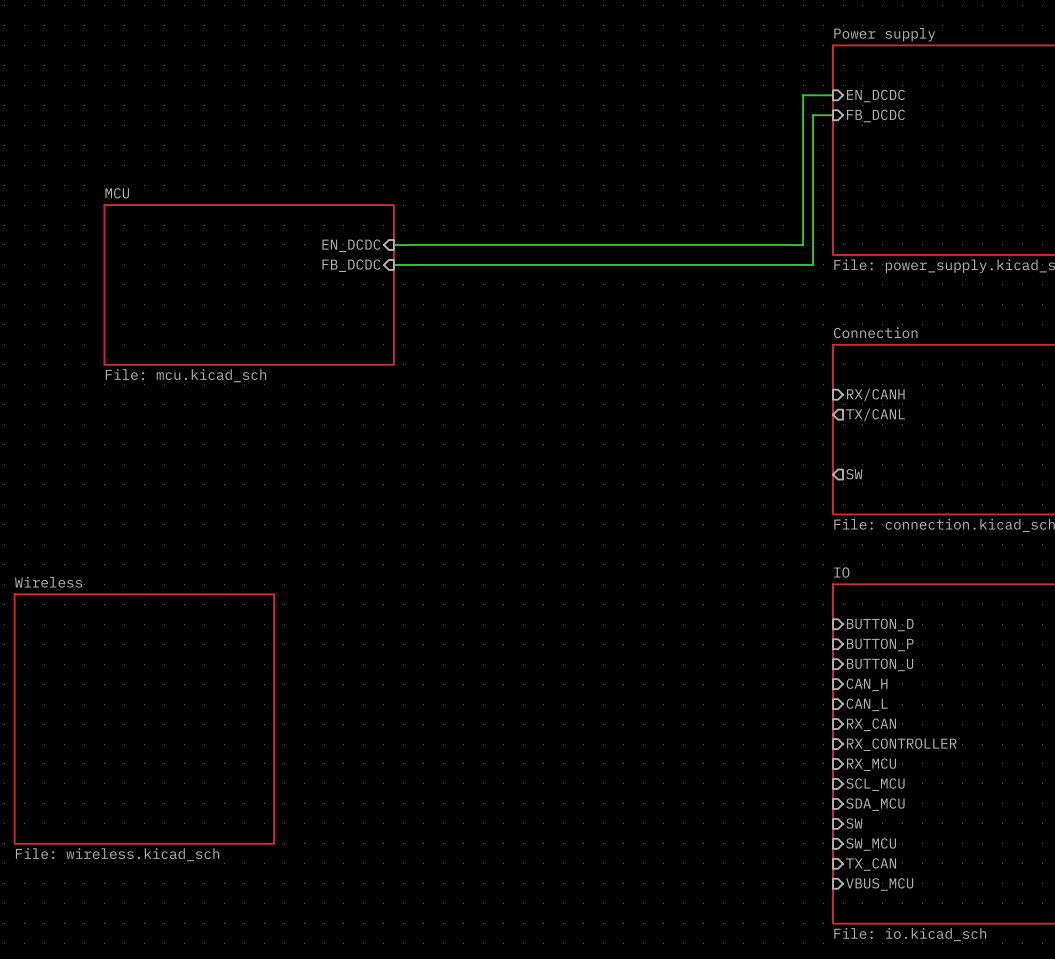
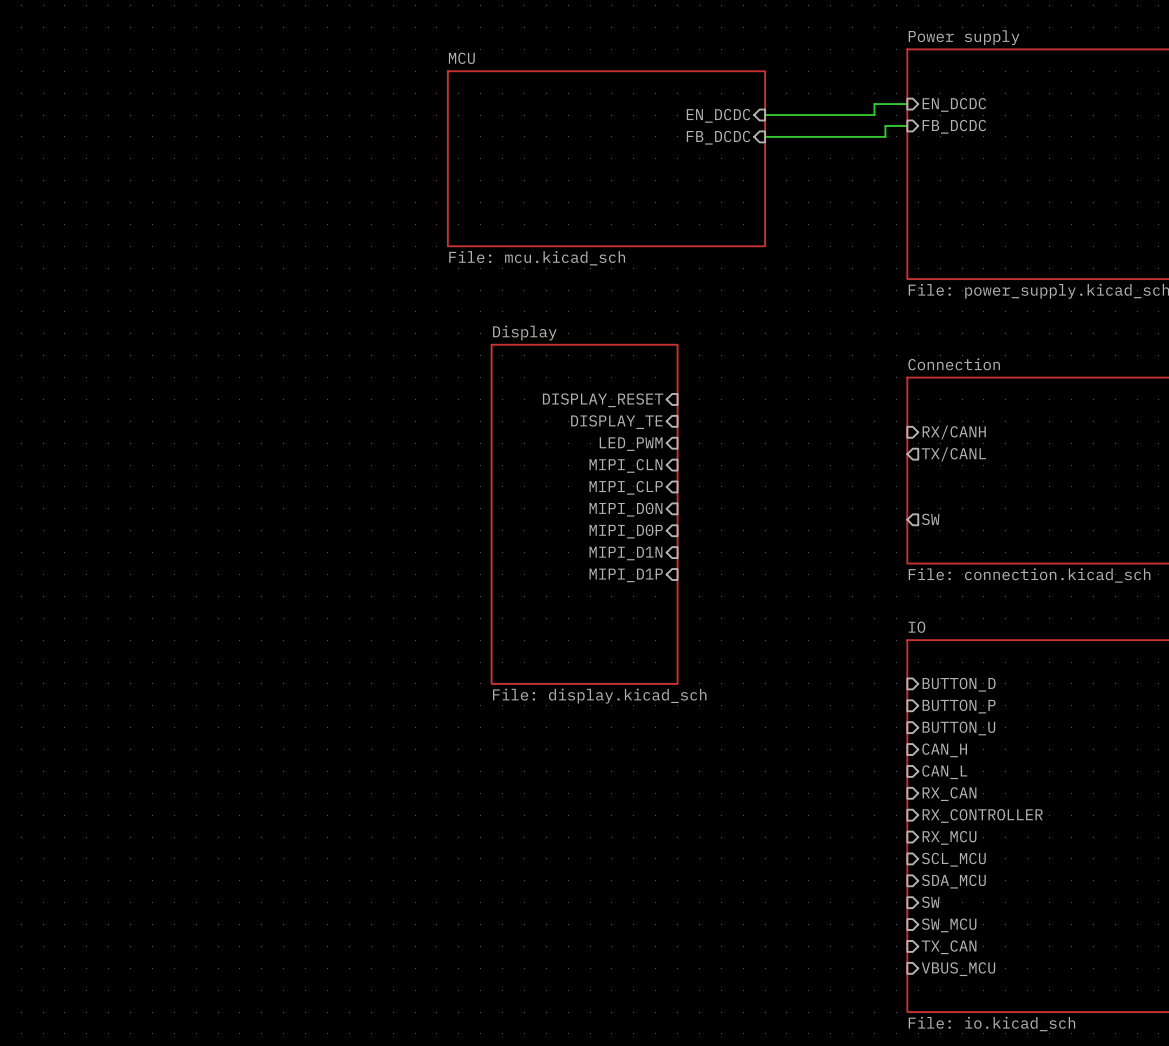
wire: (803, 105) (803, 244) (393, 244) -> (874, 115) (765, 115)
sheet pin: none -> EN_DCDC (718, 115)
sheet pin: none -> FB_DCDC (718, 137)
wire: (813, 125) (813, 264) (393, 264) -> (885, 136) (765, 136)
sheet MCU: none -> File: mcu.kicad_sch (606, 158)
sheet pin: EN_DCDC (351, 245) -> none
sheet pin: FB_DCDC (351, 265) -> none
sheet MCU: File: mcu.kicad_sch (249, 284) -> none
sheet pin: none -> DISPLAY_RESET (603, 400)
sheet pin: none -> DISPLAY_TE (616, 422)
sheet pin: none -> LED_PWM (631, 444)
sheet pin: none -> MIPI_CLN (625, 465)
sheet pin: none -> MIPI_CLP (626, 487)
sheet pin: none -> MIPI_D0N (625, 509)
sheet Display: none -> File: display.kicad_sch (584, 514)
sheet pin: none -> MIPI_D0P (626, 531)
sheet pin: none -> MIPI_D1N (625, 553)
sheet pin: none -> MIPI_D1P (626, 575)
sheet Wireless: File: wireless.kicad_sch (144, 719) -> none

